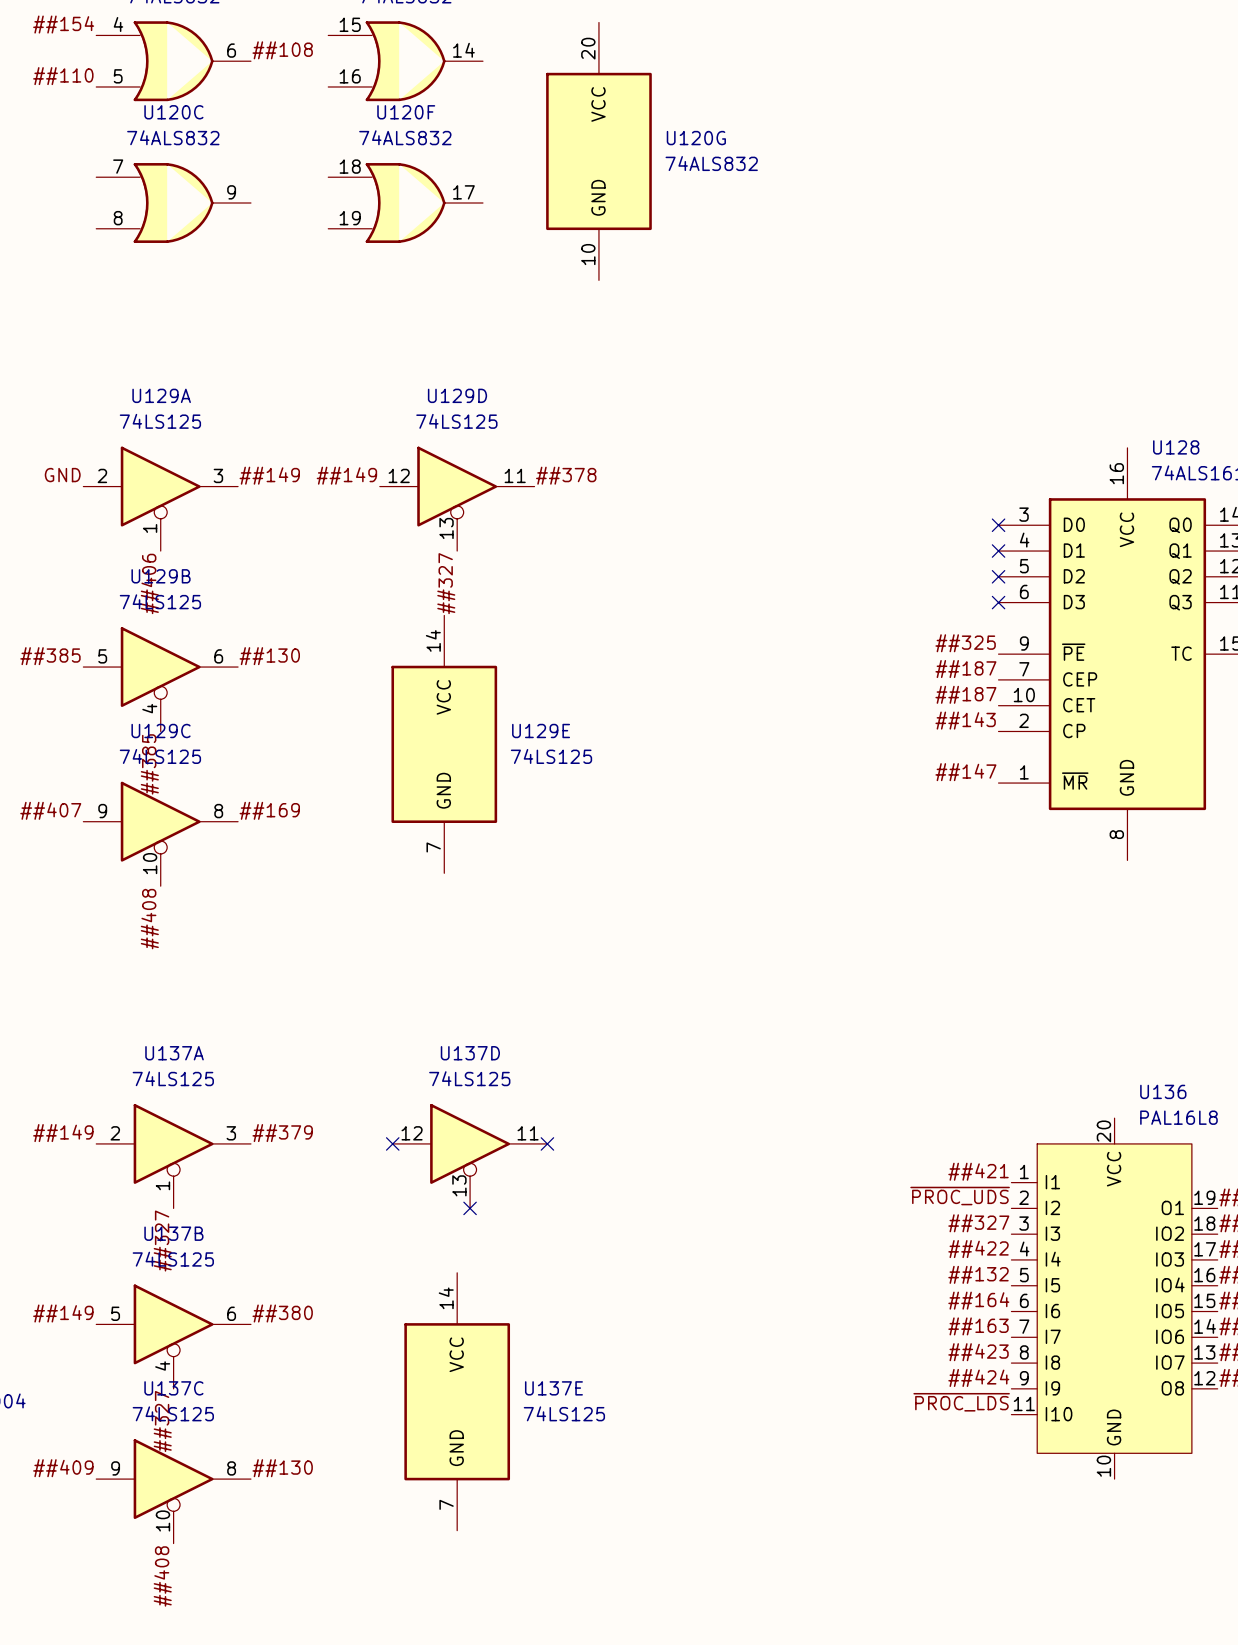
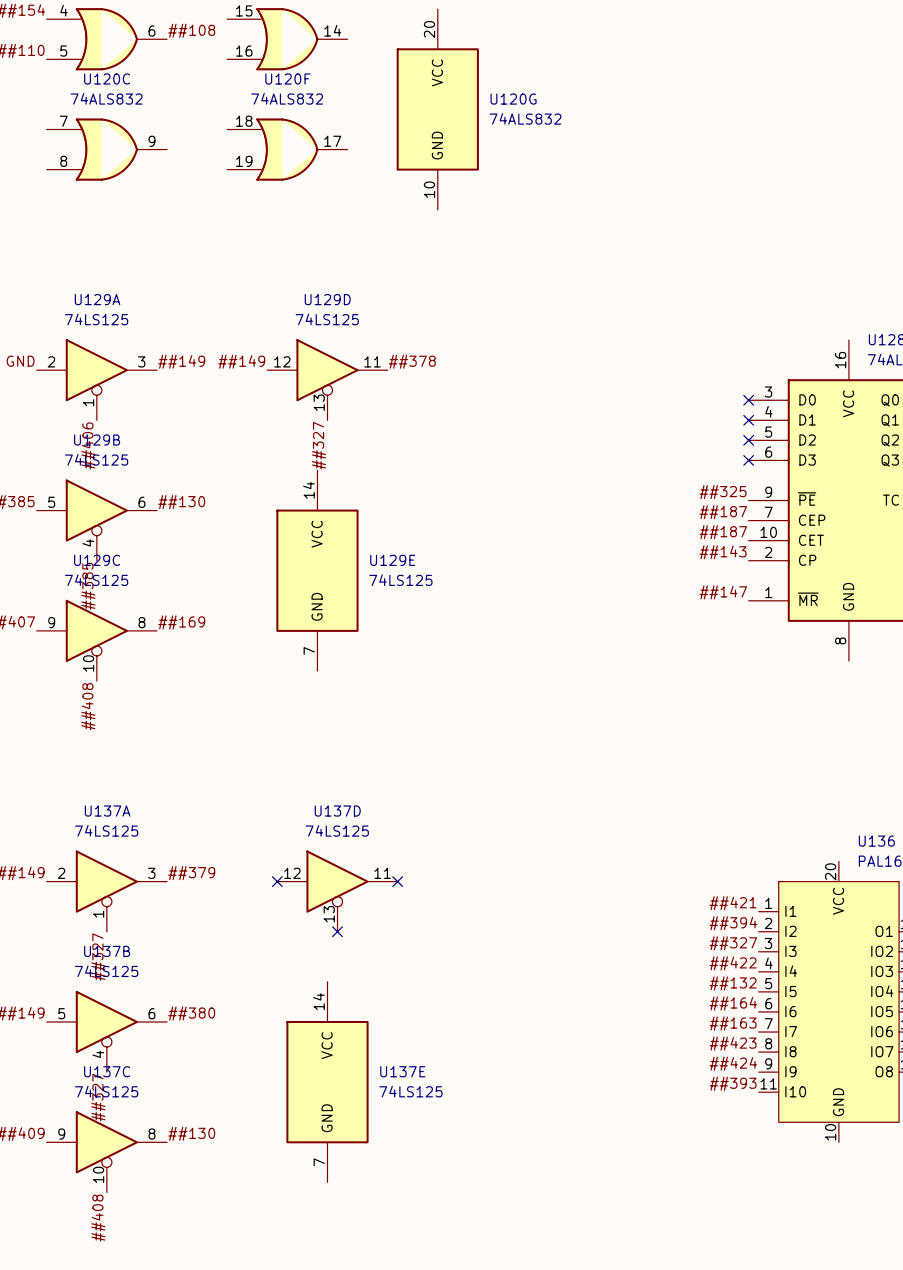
label: ~{PROC_UDS} (960, 1196) -> ##394 (733, 923)
label: ~{PROC_LDS} (961, 1402) -> ##393 (733, 1083)

